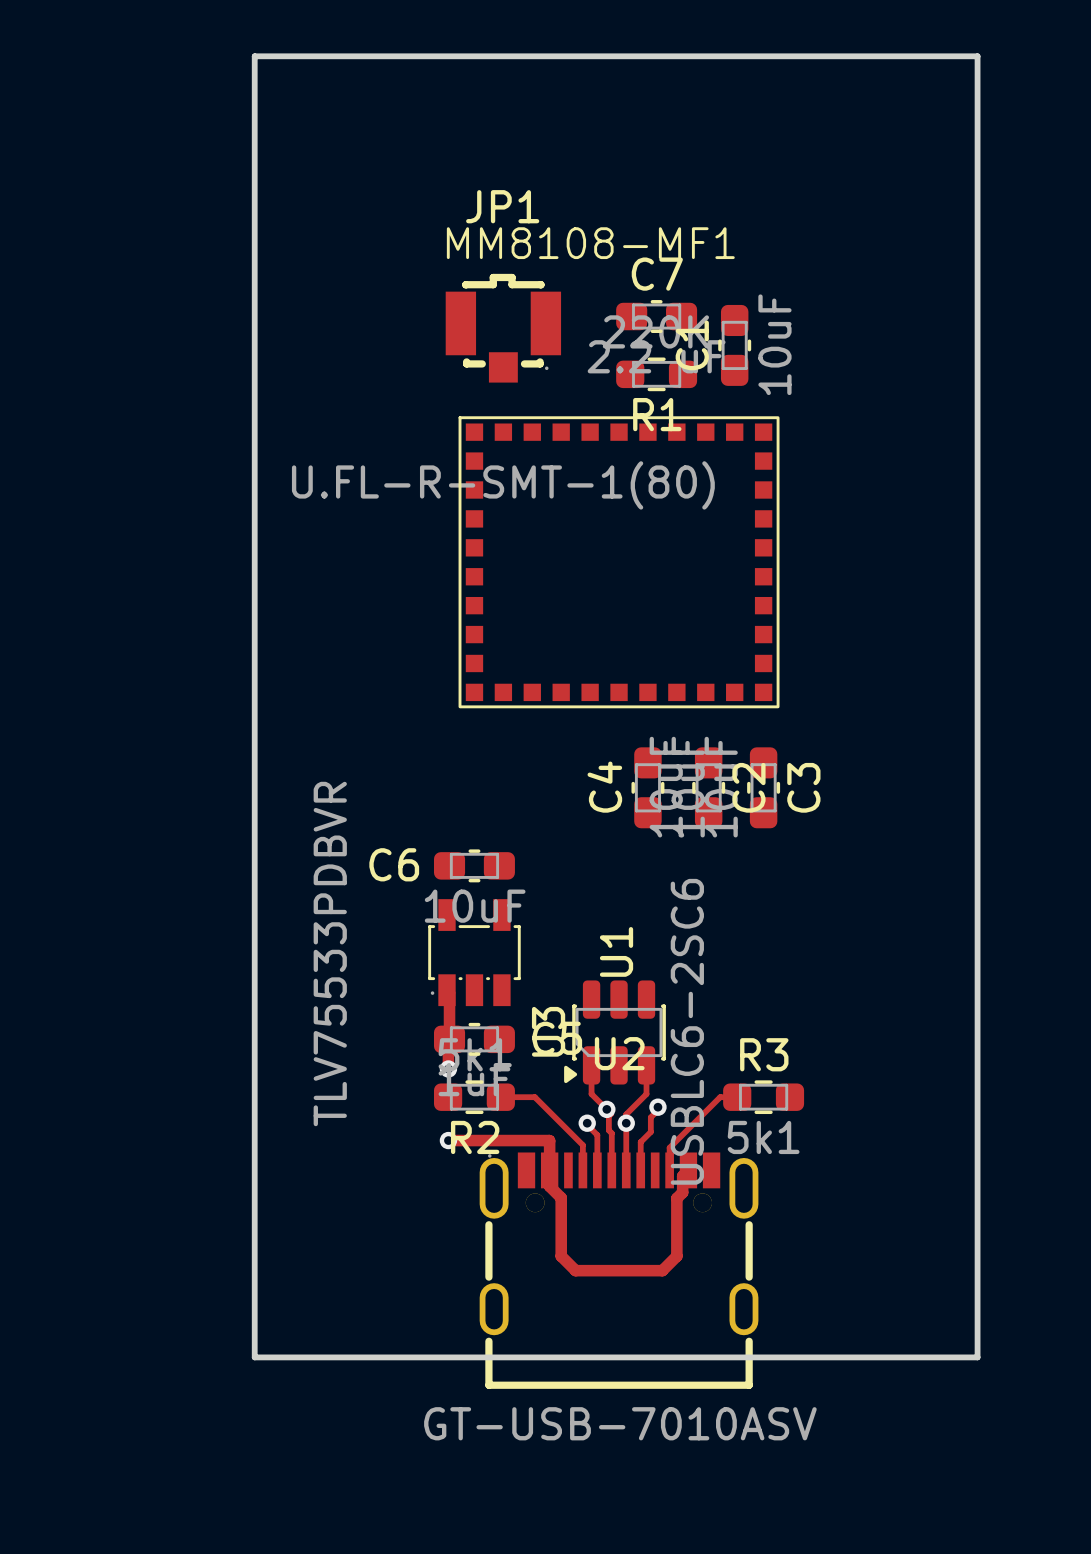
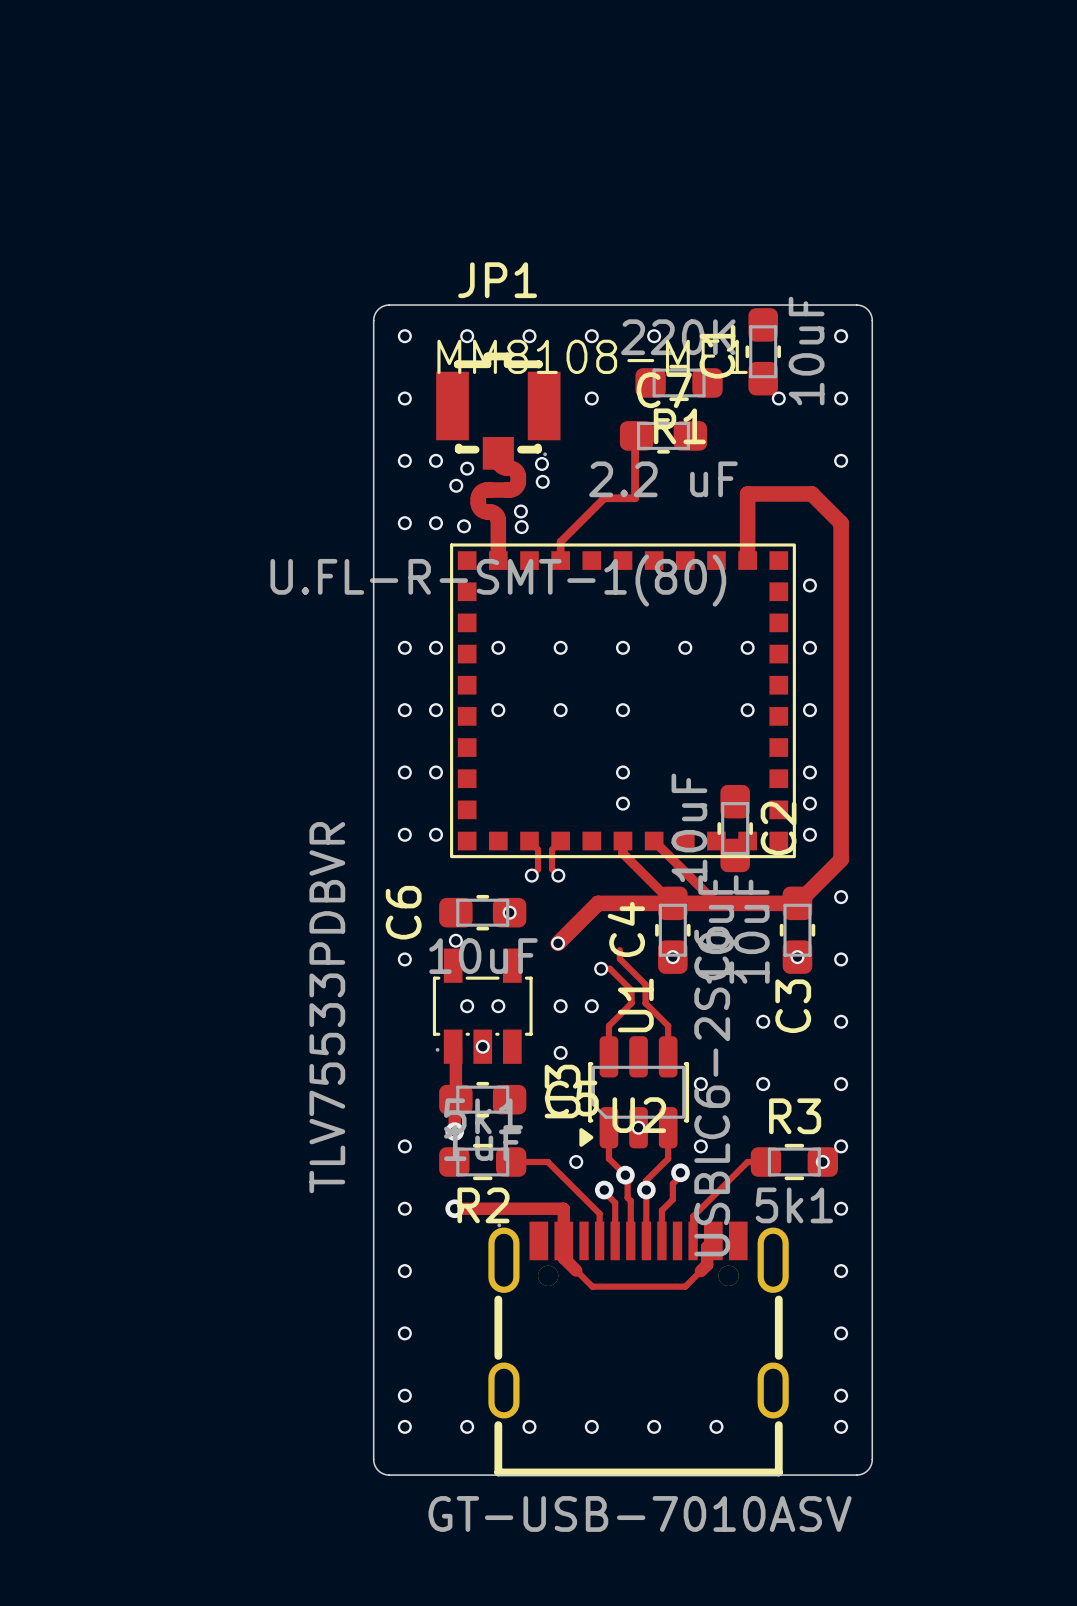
board edge: (254, 56) (977, 56) (977, 1357) (254, 1357) (254, 56) -> (373, 1459) (374, 314) (381, 307) (389, 305) (862, 306) (869, 311) (872, 320) (871, 1465) (864, 1472) (856, 1475) (389, 1475) (378, 1470) (373, 1459)
C7 position: (656, 316) -> (663, 435)
JP1 position: (503, 328) -> (498, 411)
via: none -> (404, 336)
via: none -> (467, 336)
via: none -> (529, 336)
via: none -> (591, 336)
via: none -> (654, 336)
via: none -> (841, 336)
via: none -> (404, 398)
via: none -> (591, 398)
via: none -> (778, 398)
via: none -> (841, 398)
track: none -> (636, 435) (635, 437) (635, 498) (604, 498) (560, 541) (560, 560)
track: none -> (498, 453) (500, 464) (515, 470) (518, 481) (516, 486) (512, 489) (485, 490) (478, 496) (478, 505) (480, 509) (493, 512) (497, 517) (497, 559)
via: none -> (404, 460)
via: none -> (436, 460)
via: none -> (841, 460)
via: none -> (541, 463)
via: none -> (467, 468)
via: none -> (542, 481)
via: none -> (456, 485)
via: none -> (520, 511)
via: none -> (404, 523)
via: none -> (436, 523)
via: none -> (464, 526)
via: none -> (521, 527)
track: none -> (747, 560) (747, 493) (811, 493) (841, 523) (841, 859) (797, 903) (598, 903) (558, 943)
MM8108-MF1 position: (619, 562) -> (622, 700)
via: none -> (809, 585)
via: none -> (404, 647)
via: none -> (436, 647)
via: none -> (498, 647)
via: none -> (560, 647)
via: none -> (622, 647)
via: none -> (685, 647)
via: none -> (747, 647)
via: none -> (809, 647)
via: none -> (404, 710)
via: none -> (436, 710)
via: none -> (498, 710)
via: none -> (560, 710)
via: none -> (622, 710)
via: none -> (747, 710)
via: none -> (809, 710)
via: none -> (404, 772)
via: none -> (436, 772)
via: none -> (622, 772)
via: none -> (809, 772)
via: none -> (622, 803)
via: none -> (809, 803)
C4 position: (647, 787) -> (672, 930)
C3 position: (763, 787) -> (797, 930)
C3 name position: C3 (803, 787) -> C3 (793, 1006)
via: none -> (404, 834)
via: none -> (436, 834)
via: none -> (809, 834)
track: none -> (529, 841) (538, 849) (538, 869) (531, 875)
track: none -> (560, 841) (552, 849) (552, 869) (558, 875)
track: none -> (622, 841) (622, 853) (672, 903)
track: none -> (654, 841) (716, 903) (738, 903)
via: none -> (531, 875)
via: none -> (558, 875)
via: none -> (841, 897)
C6 name rotation: 0° (394, 864) -> 90° counterclockwise (403, 912)
via: none -> (509, 912)
via: none -> (455, 940)
via: none -> (558, 943)
track: none -> (619, 950) (619, 958) (645, 984) (645, 1003) (668, 1025) (668, 1056)
via: none -> (672, 957)
via: none -> (797, 957)
via: none -> (404, 959)
via: none -> (841, 959)
track: none -> (601, 968) (609, 968) (631, 990) (631, 1003) (608, 1025) (608, 1056)
via: none -> (601, 968)
via: none -> (467, 1006)
via: none -> (498, 1006)
via: none -> (560, 1006)
via: none -> (591, 1006)
via: none -> (763, 1021)
via: none -> (841, 1021)
via: none -> (482, 1046)
via: none -> (560, 1052)
via: none -> (700, 1084)
via: none -> (763, 1084)
via: none -> (841, 1084)
via: none -> (638, 1127)
via: none -> (404, 1146)
via: none -> (700, 1146)
via: none -> (841, 1146)
via: none -> (576, 1162)
via: none -> (822, 1162)
via: none -> (404, 1208)
via: none -> (841, 1208)
track: (561, 1197) (561, 1256) (575, 1270) (662, 1270) (676, 1256) (676, 1198) -> (576, 1270) (592, 1286) (685, 1286) (700, 1271)
via: none -> (404, 1271)
via: none -> (841, 1271)
via: none -> (404, 1333)
via: none -> (841, 1333)
via: none -> (404, 1395)
via: none -> (841, 1395)
via: none -> (404, 1426)
via: none -> (467, 1426)
via: none -> (529, 1426)
via: none -> (591, 1426)
via: none -> (654, 1426)
via: none -> (716, 1426)
via: none -> (841, 1426)

